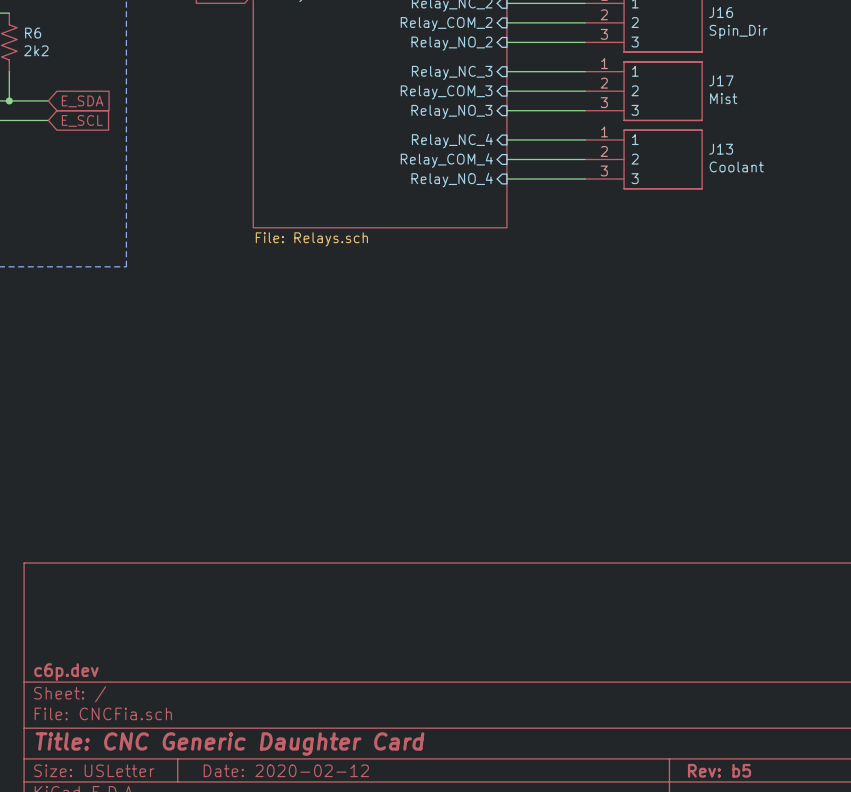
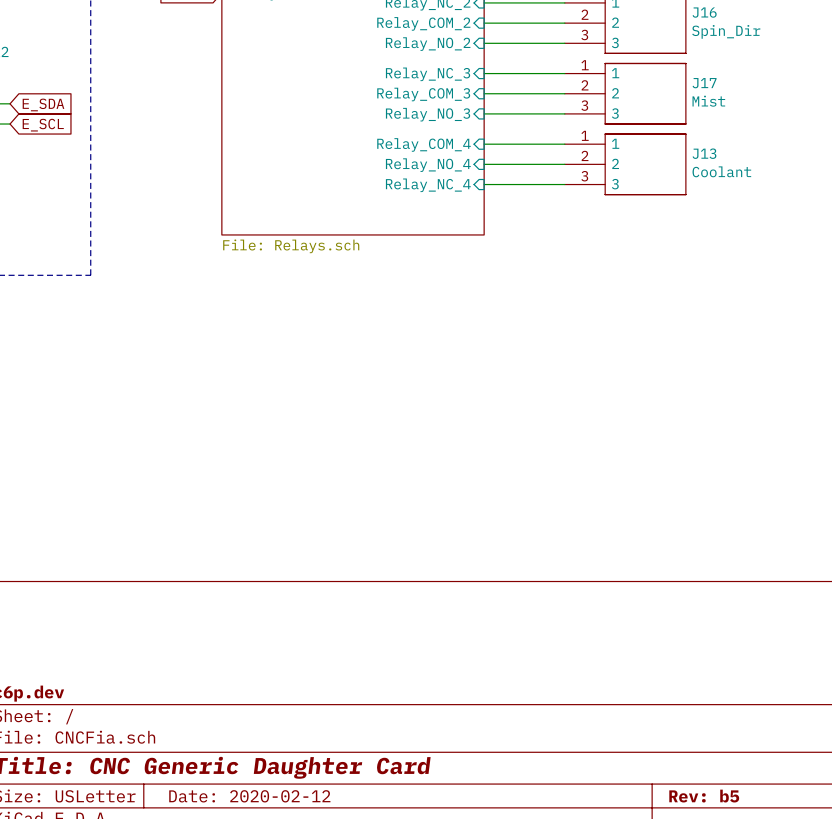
sheet pin: Relay_NC_4 (452, 141) -> Relay_COM_4 (424, 144)
sheet pin: Relay_COM_4 (446, 160) -> Relay_NO_4 (428, 165)
sheet pin: Relay_NO_4 (452, 180) -> Relay_NC_4 (428, 185)

